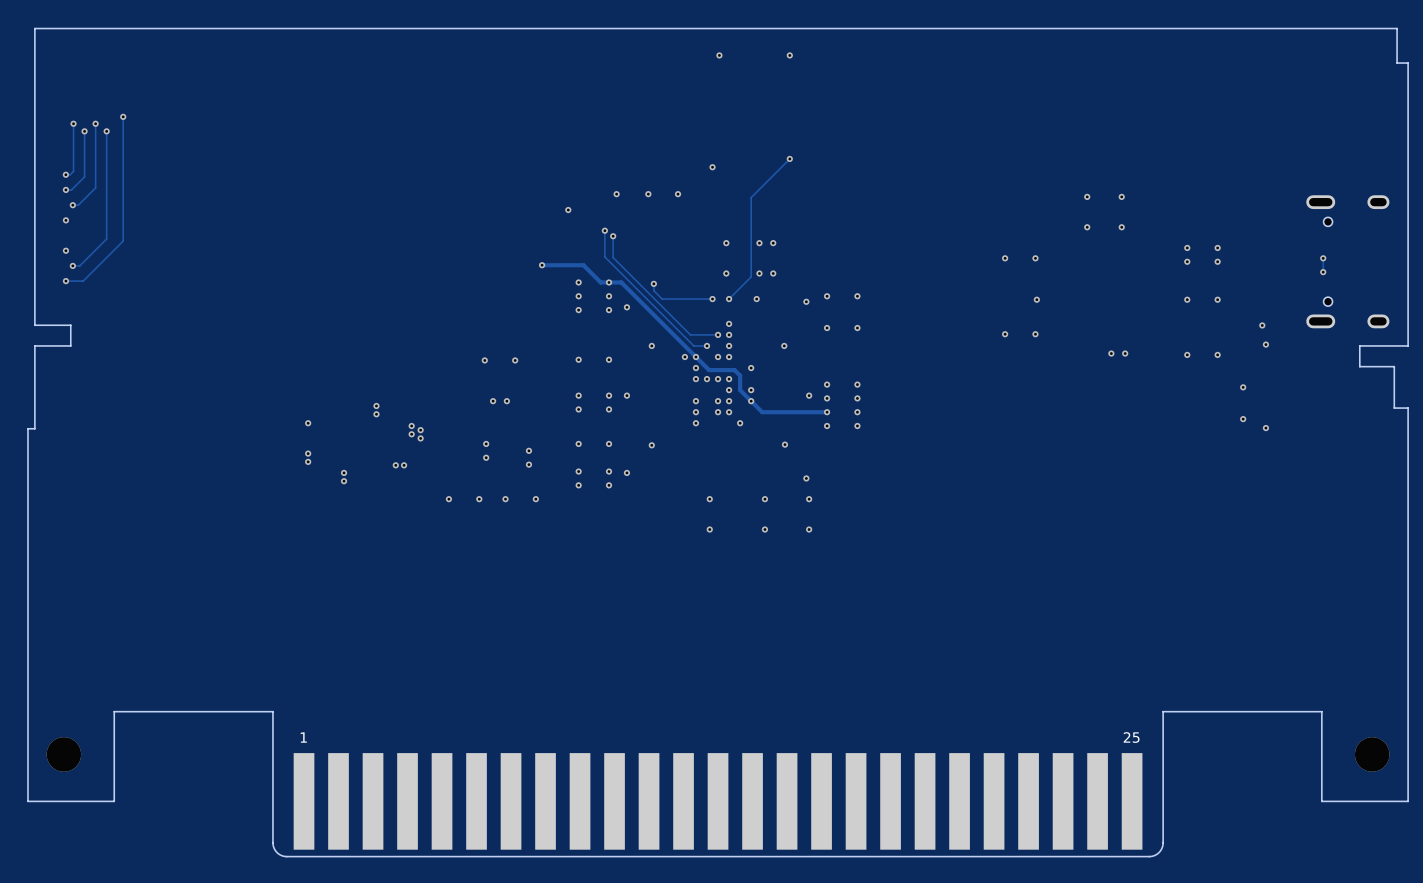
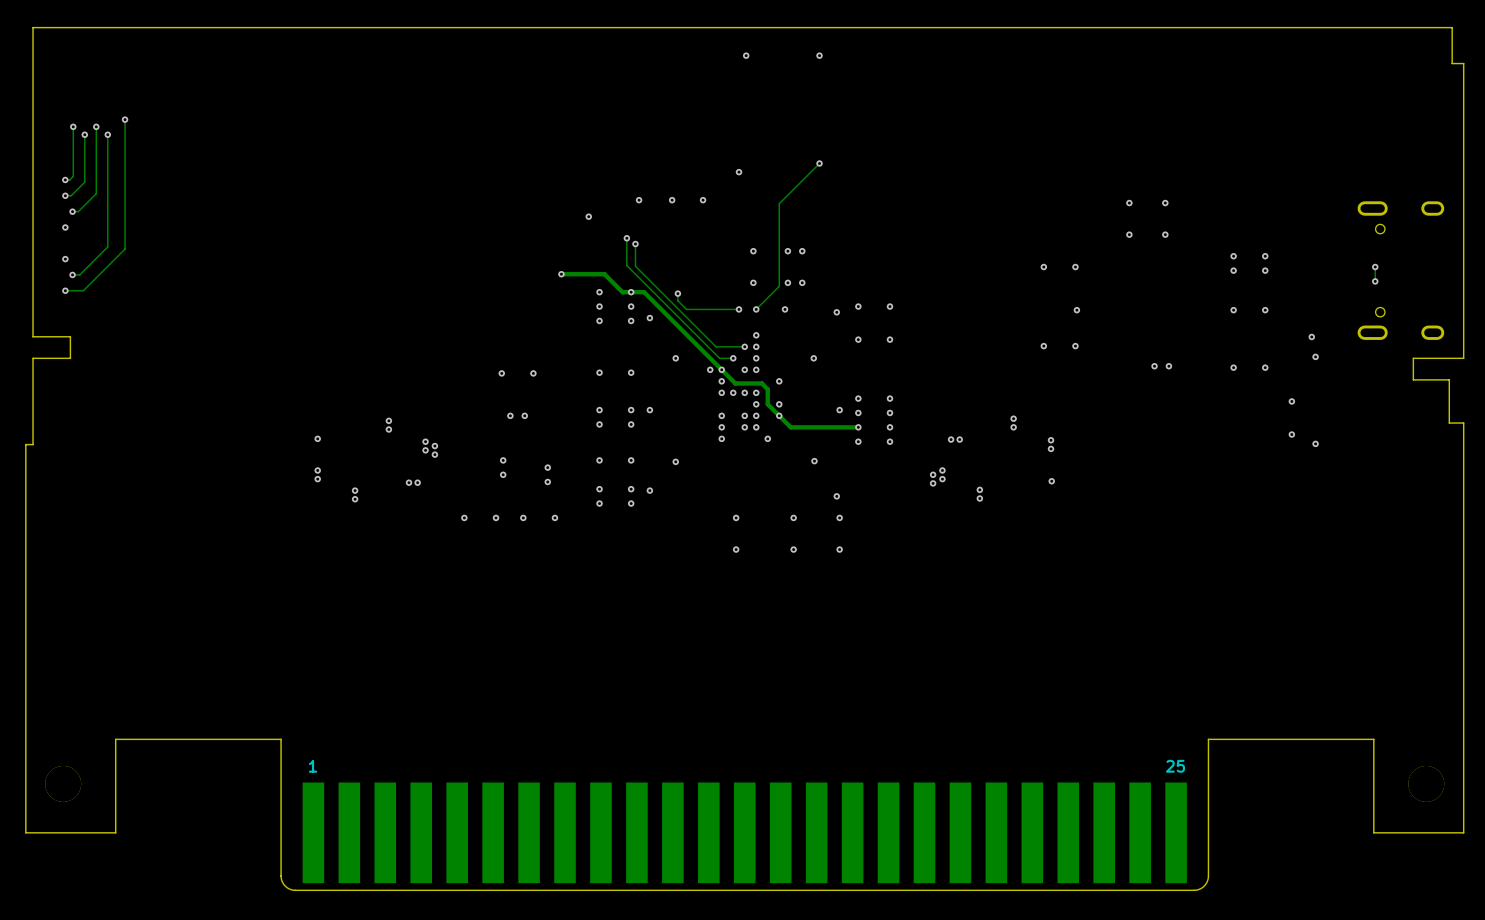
via: none -> (1013, 418)
via: none -> (1013, 427)
via: none -> (951, 439)
via: none -> (959, 439)
via: none -> (1051, 440)
via: none -> (1051, 448)
via: none -> (942, 470)
via: none -> (933, 474)
via: none -> (942, 479)
via: none -> (1051, 481)
via: none -> (933, 483)
via: none -> (979, 489)
via: none -> (979, 498)

